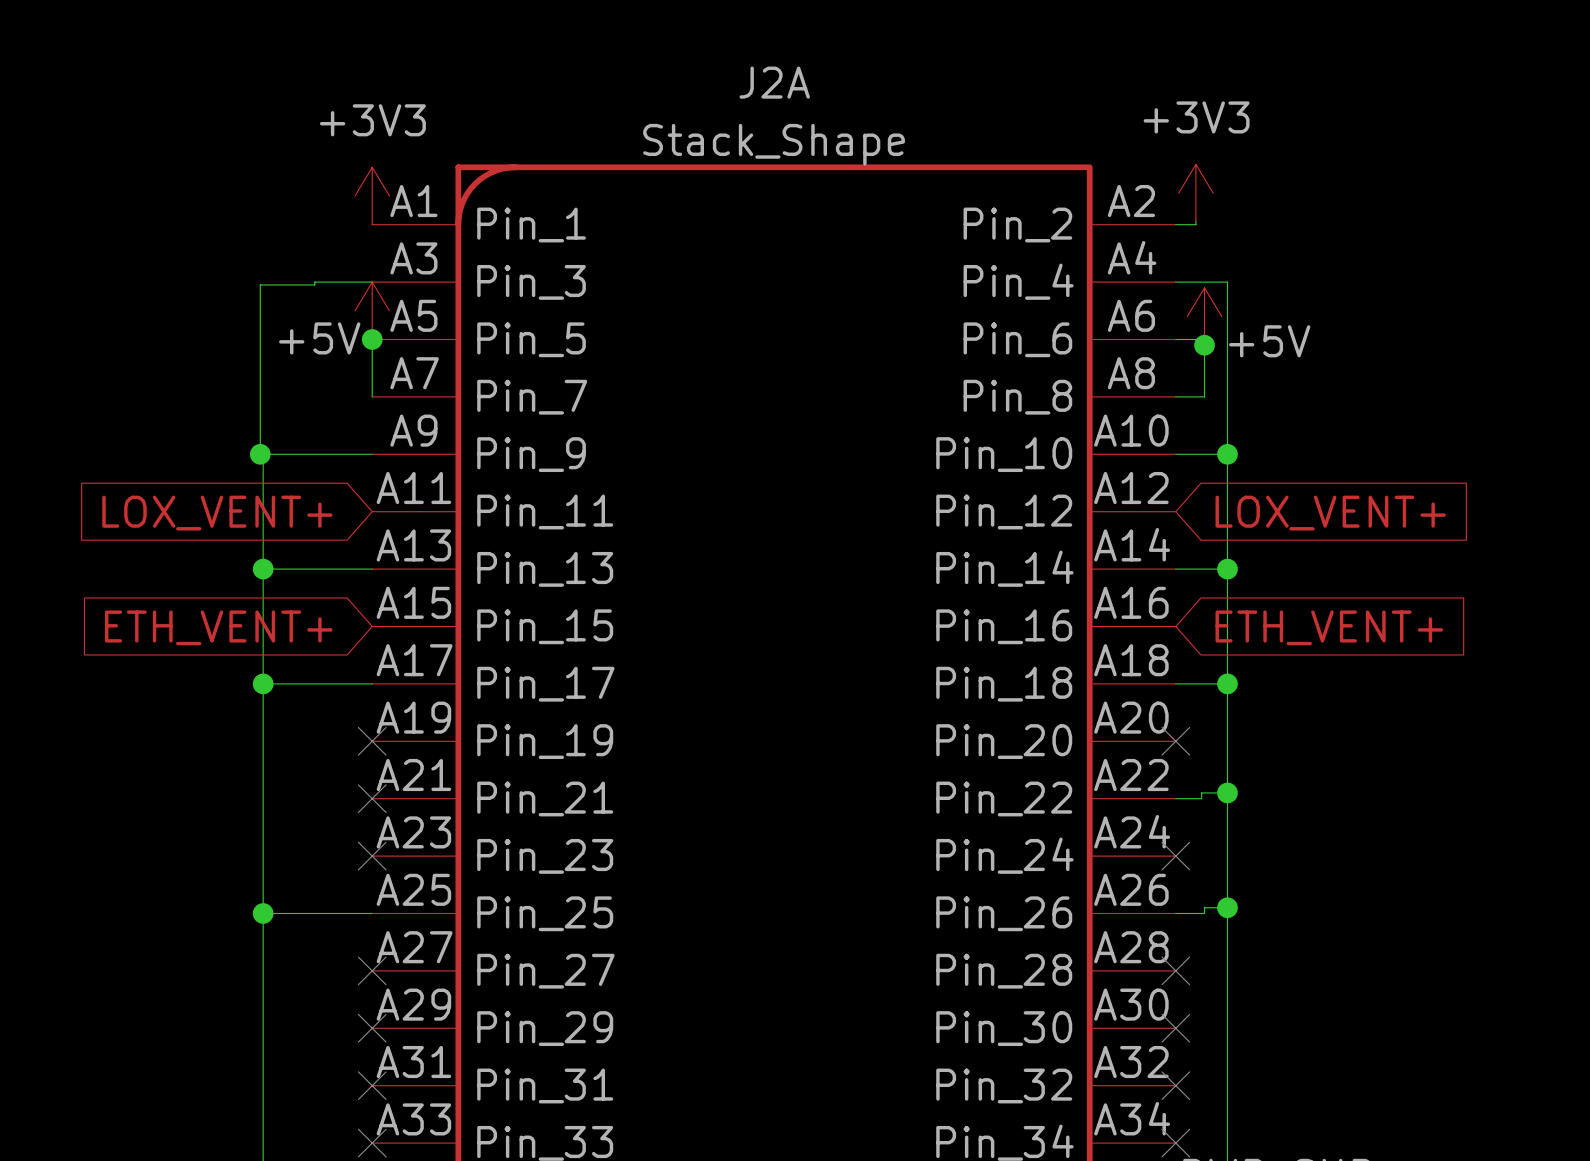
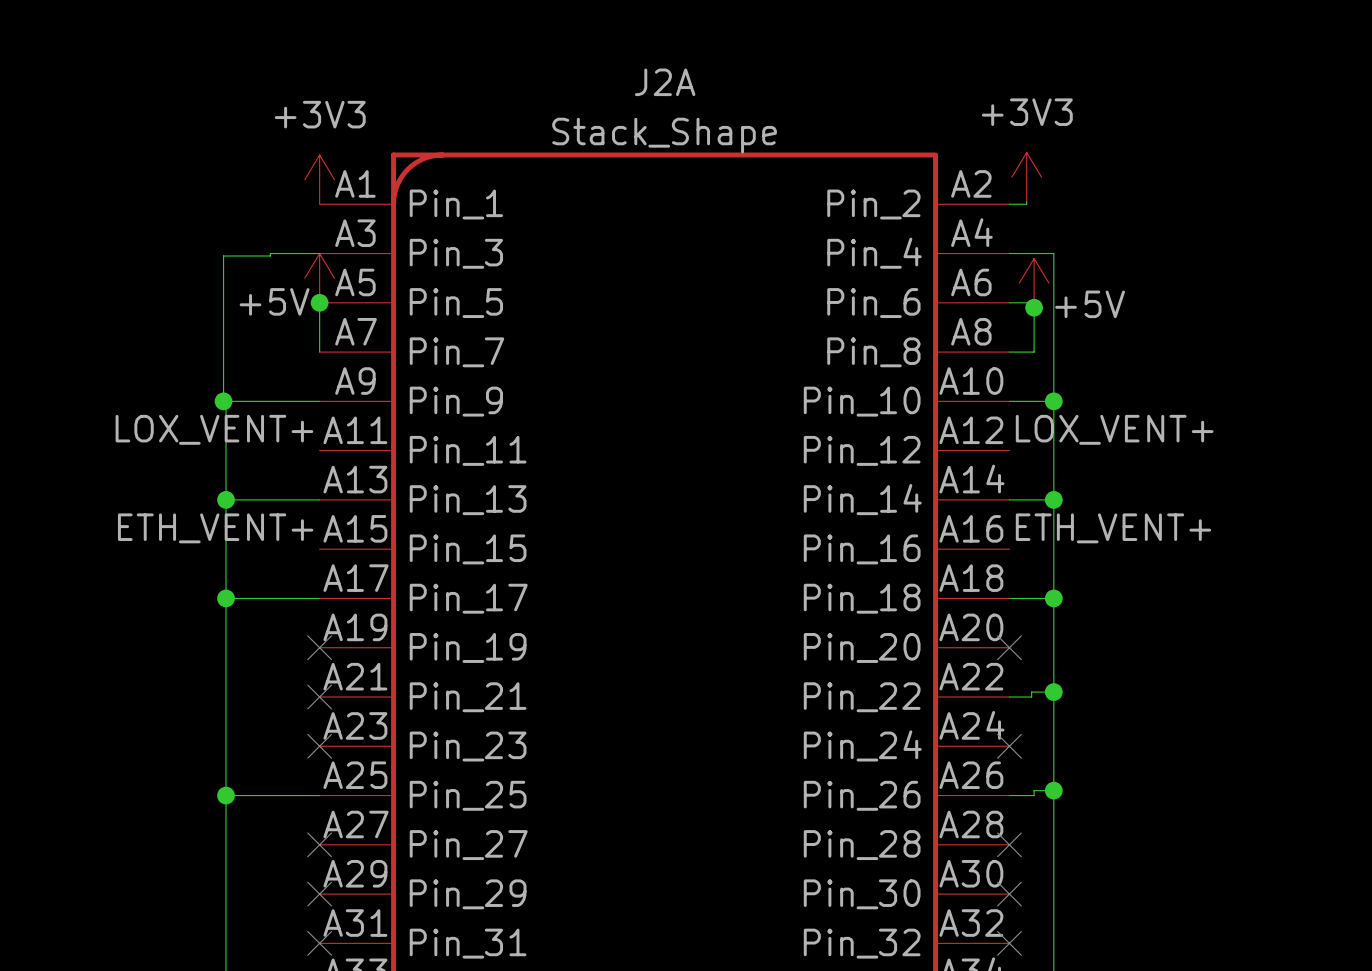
label: none -> LOX_VENT+ (214, 429)
label: none -> LOX_VENT+ (1114, 429)
global label: LOX_VENT+ (217, 513) -> none
global label: LOX_VENT+ (1330, 513) -> none
label: none -> ETH_VENT+ (215, 528)
label: none -> ETH_VENT+ (1113, 528)
global label: ETH_VENT+ (218, 627) -> none
global label: ETH_VENT+ (1329, 627) -> none

